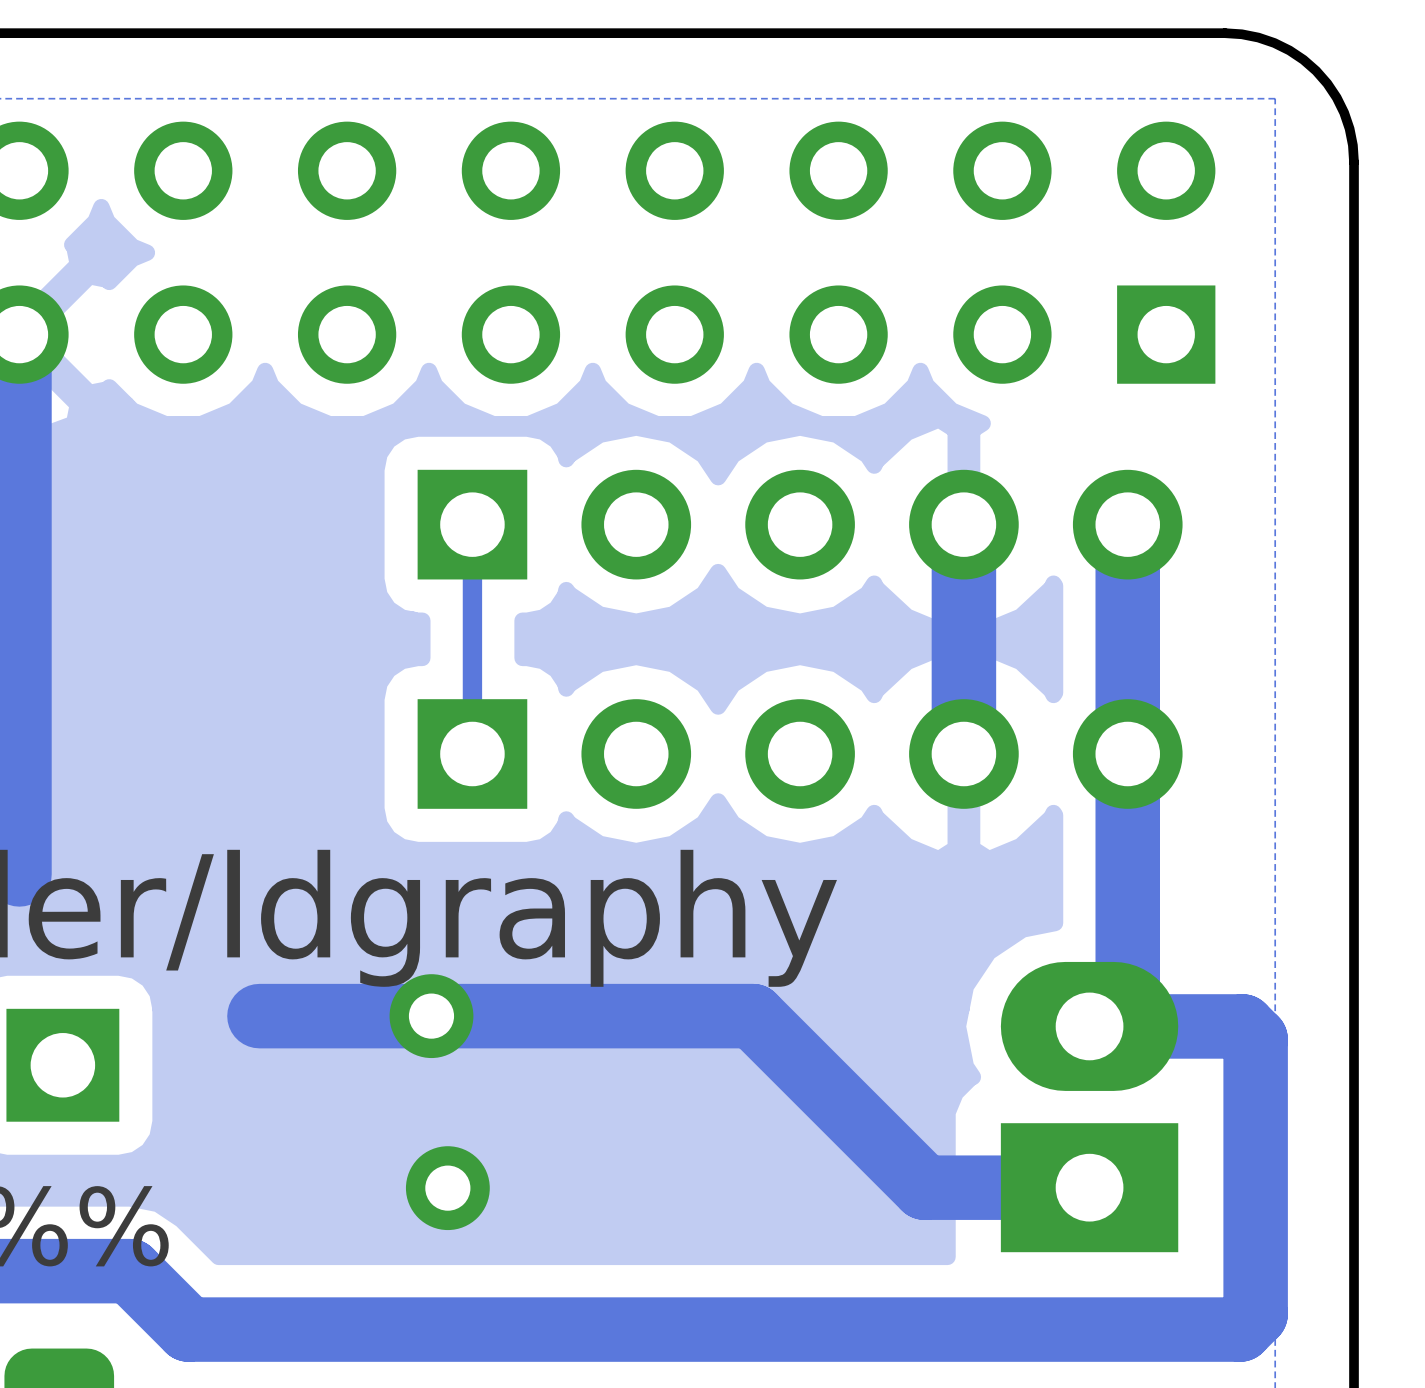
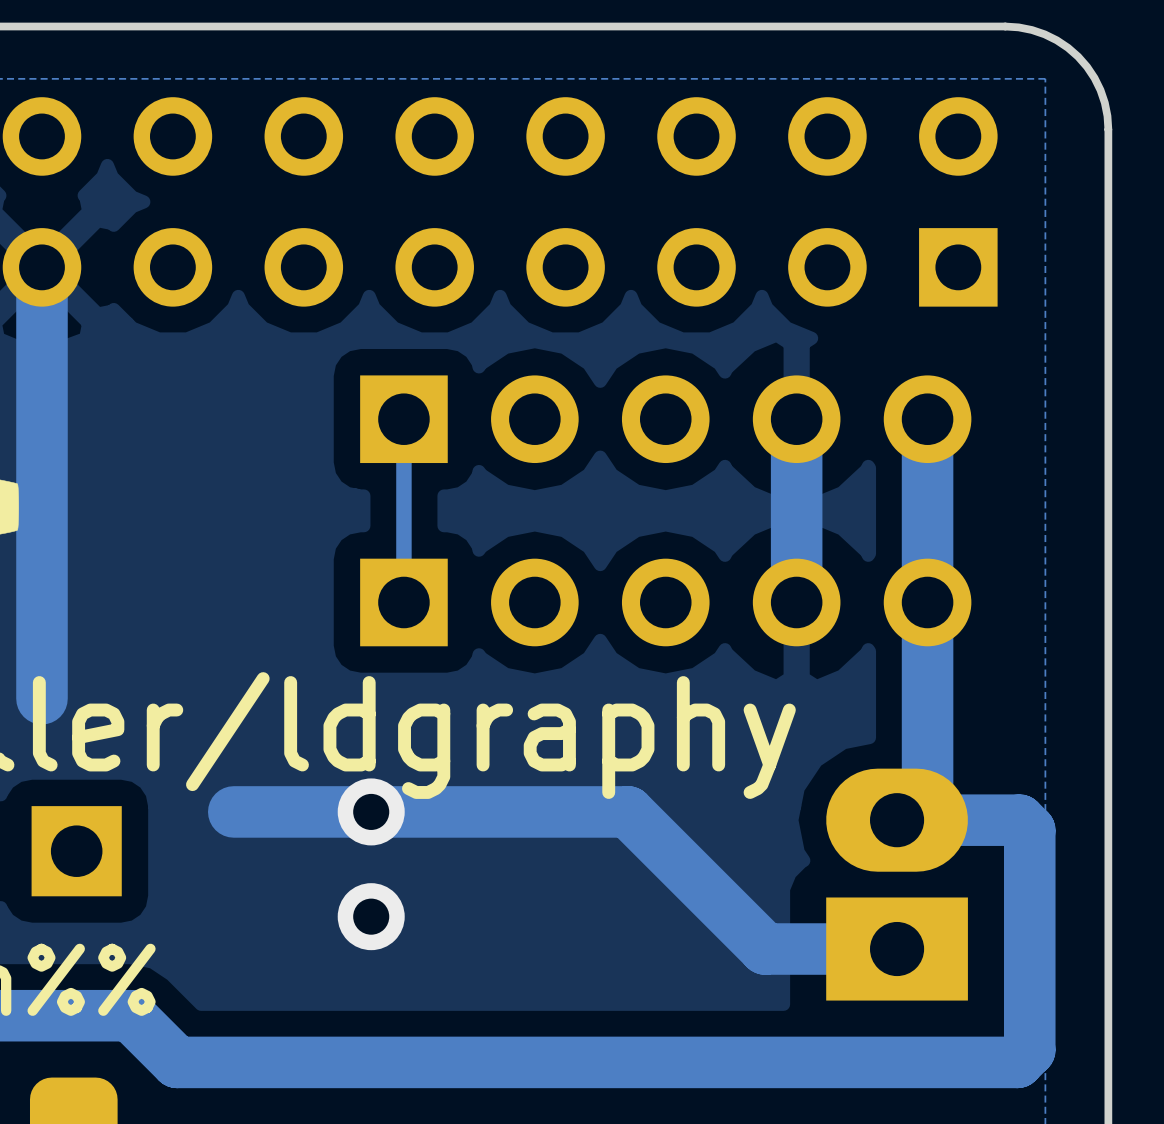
via position: (447, 1188) -> (371, 916)

